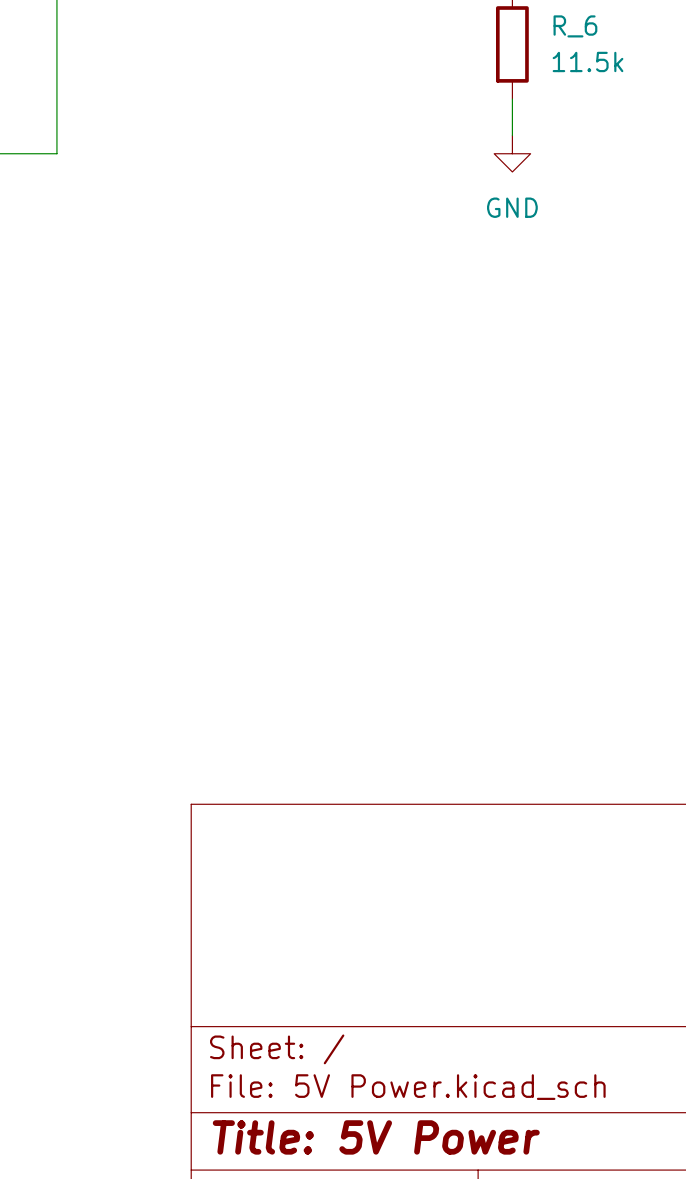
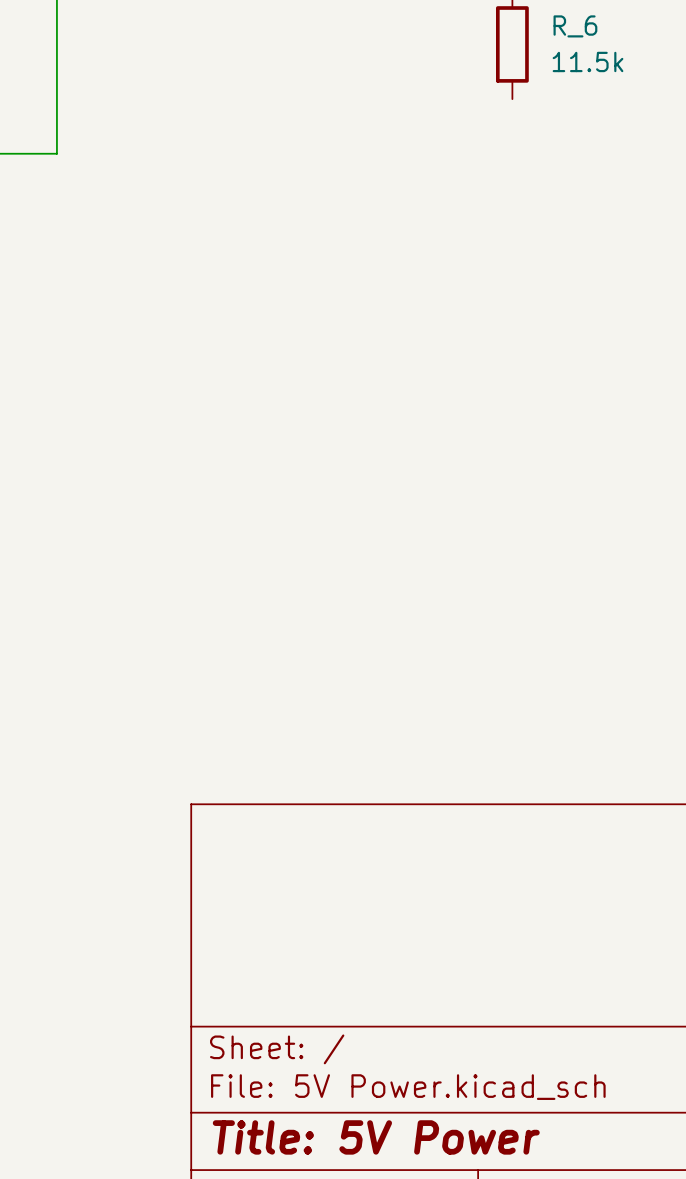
wire: (512, 99) (512, 135) -> none
power symbol: GND (512, 153) -> none

